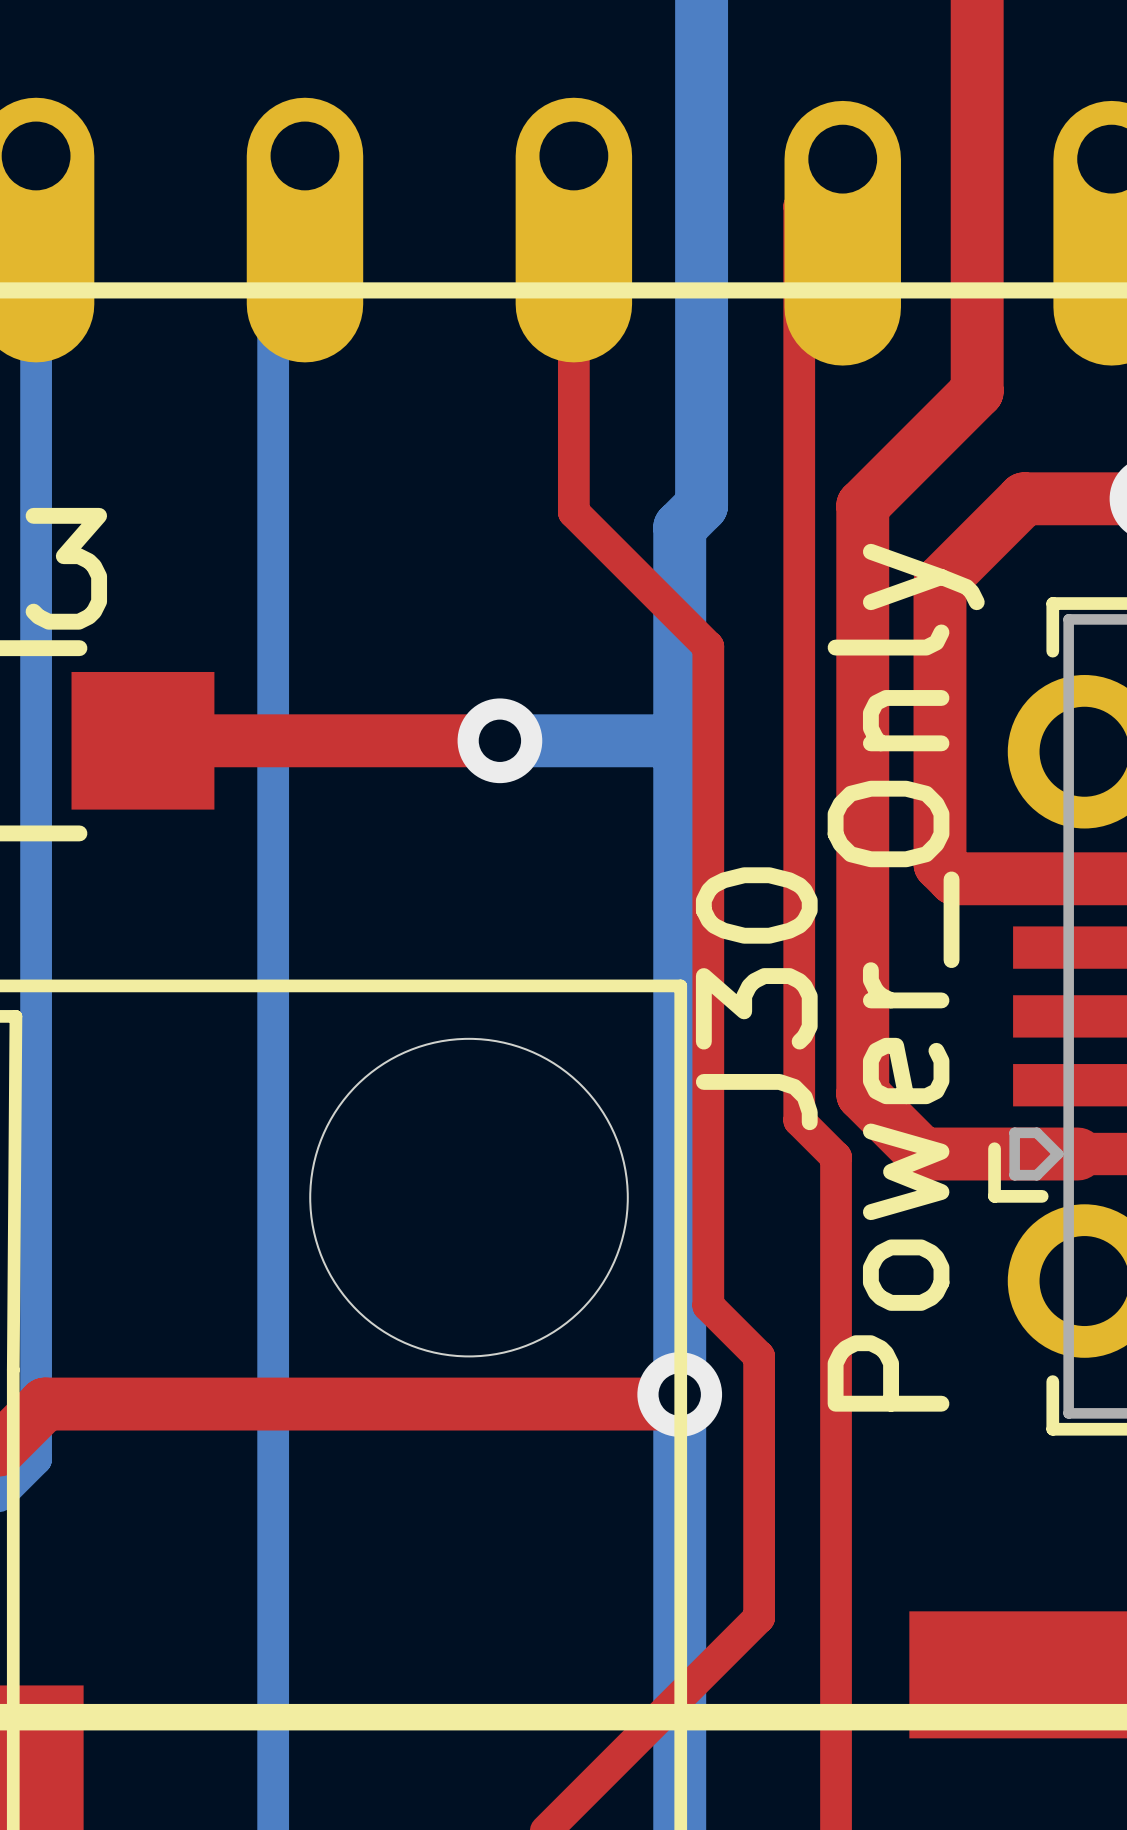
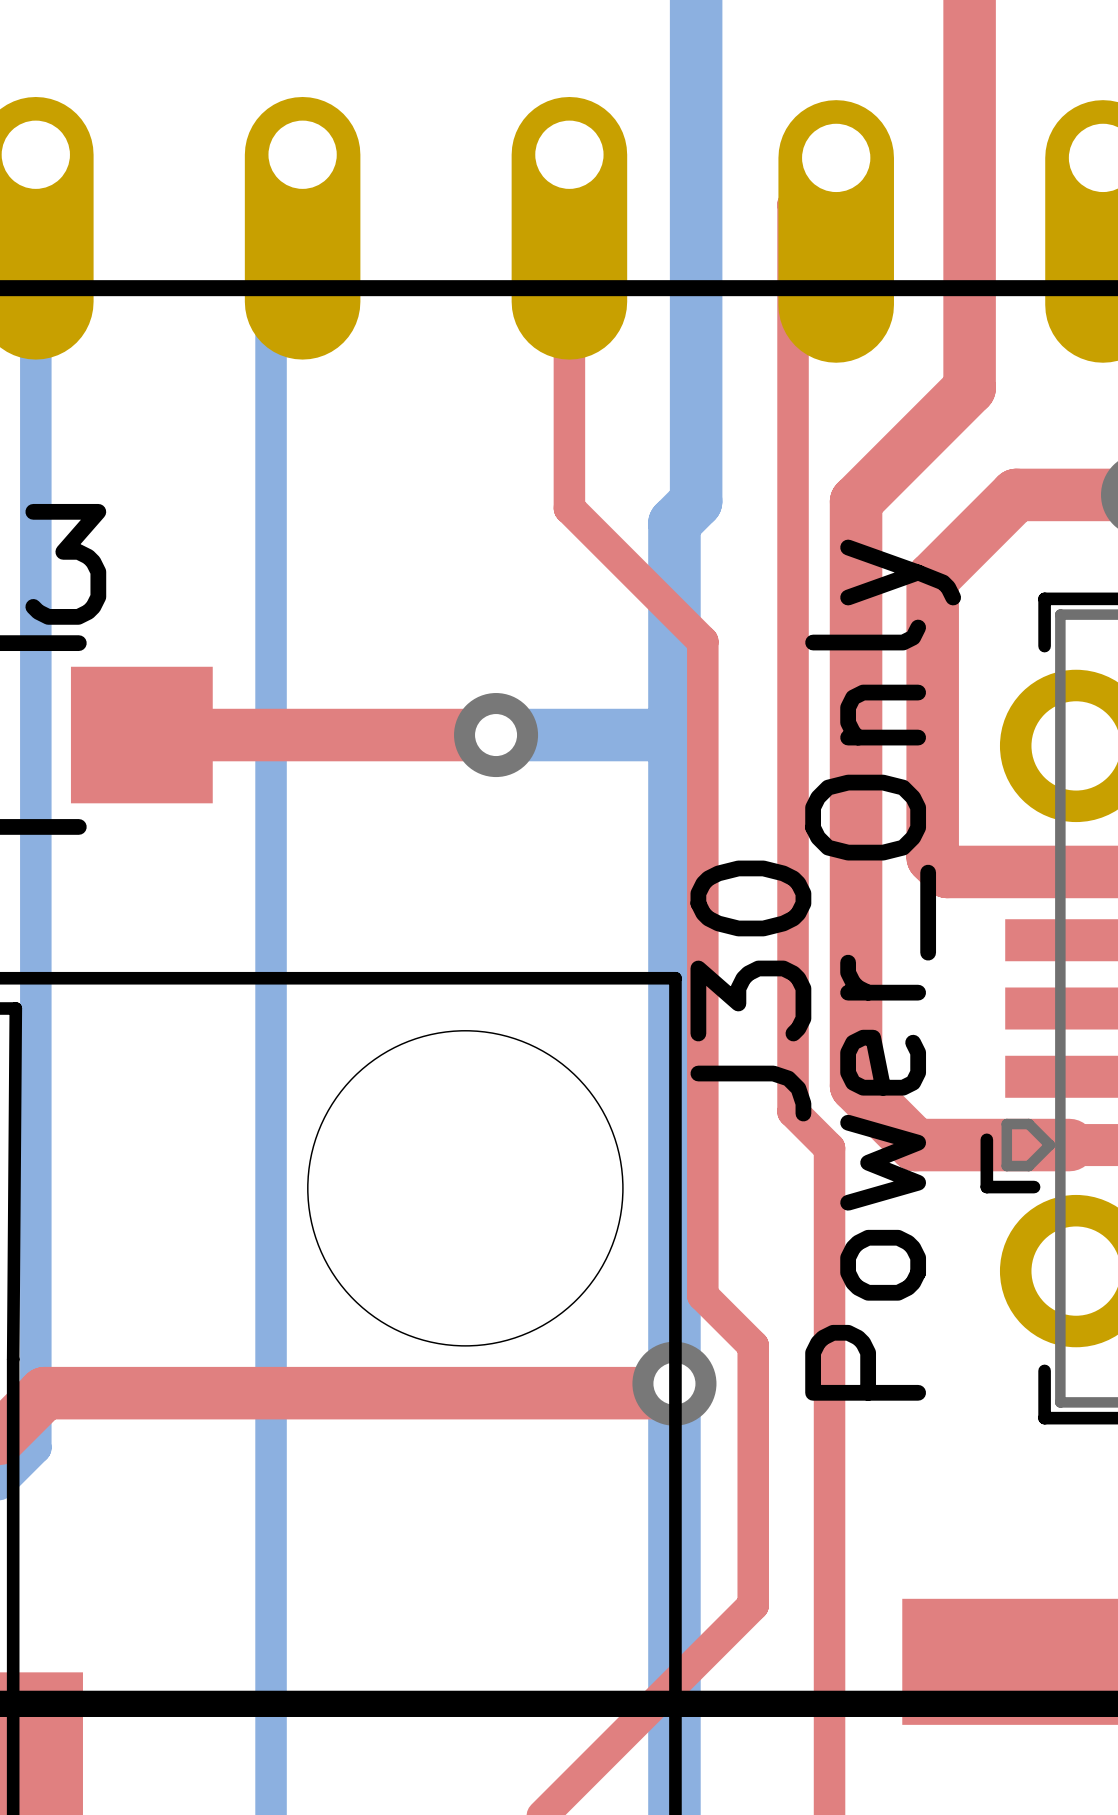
J30 value position: Power_Only (906, 977) -> Power_Only (883, 970)

